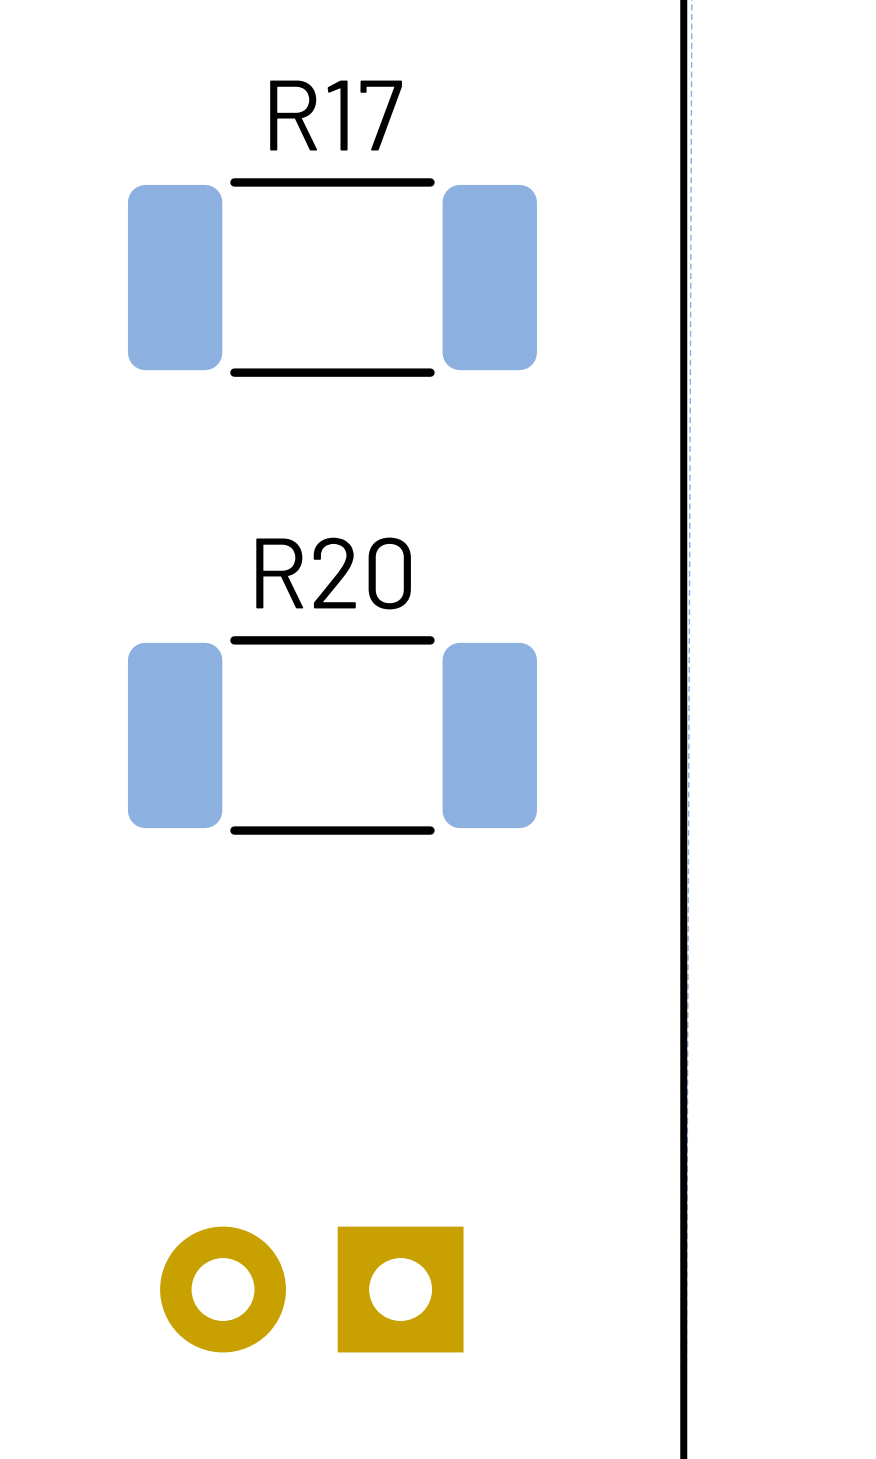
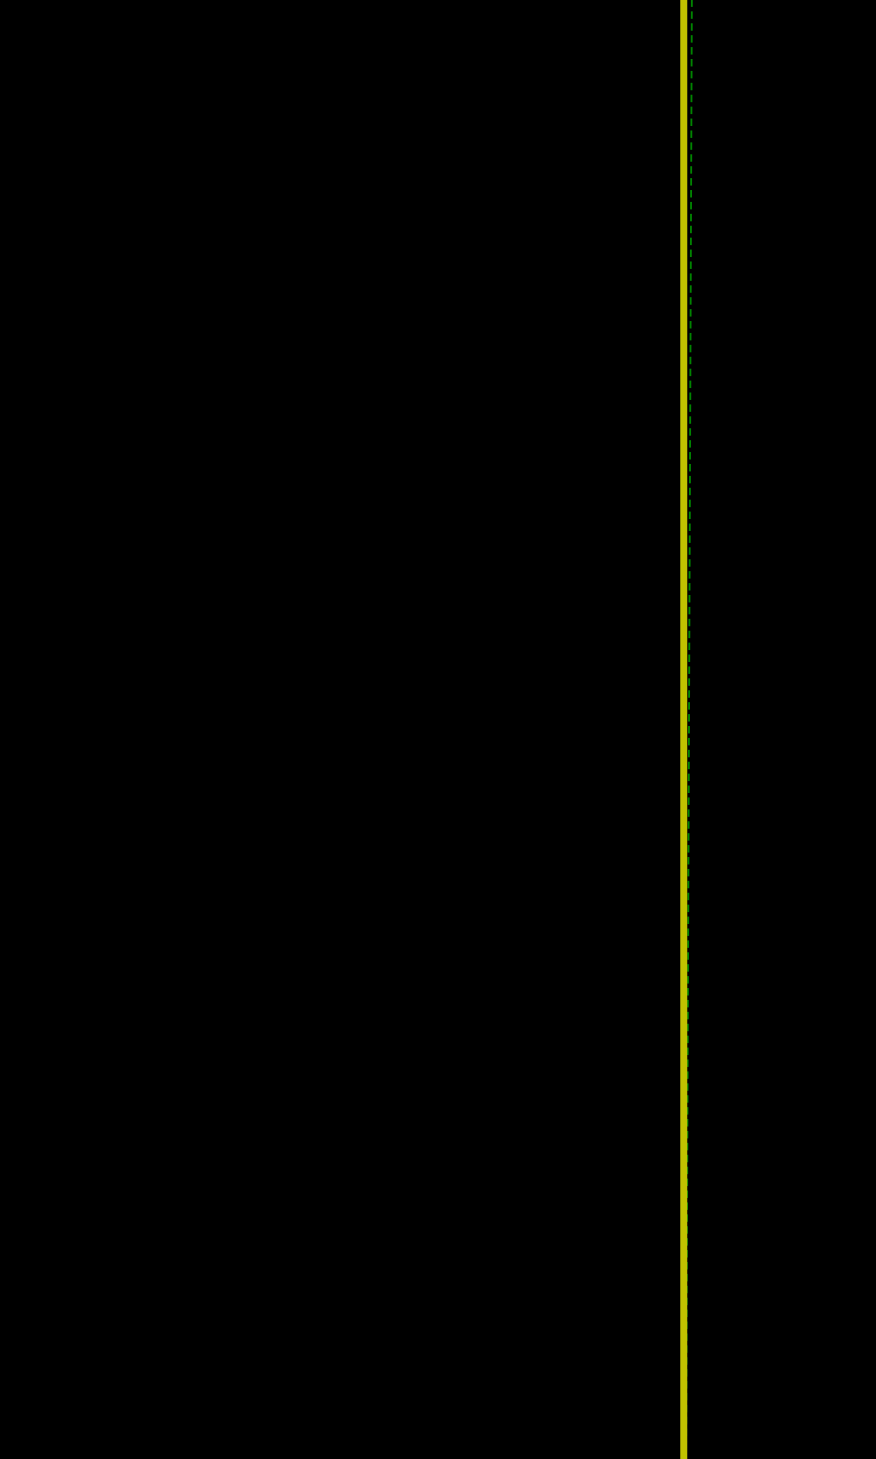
R17: (332, 277) -> none
R20: (332, 735) -> none
part: (311, 1289) -> none

